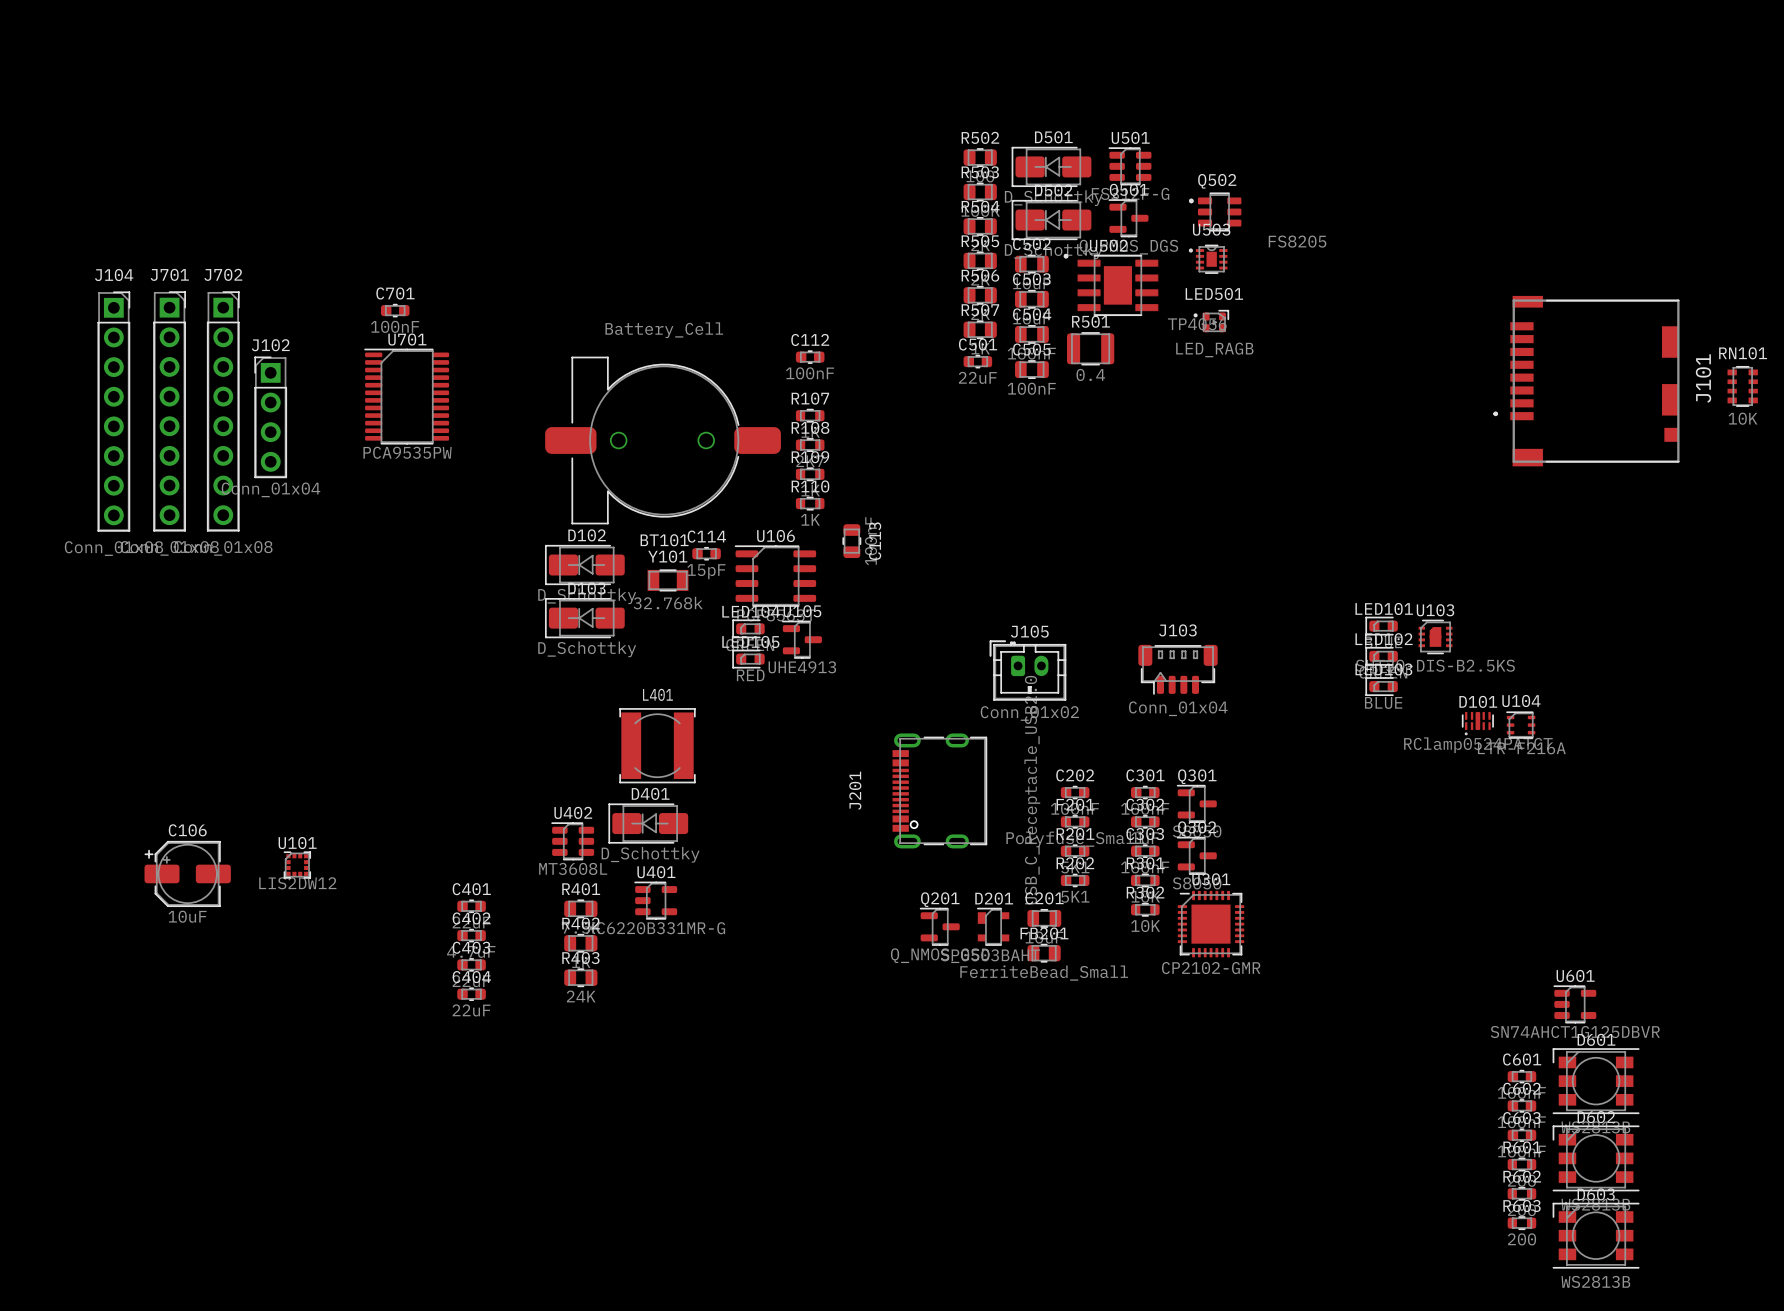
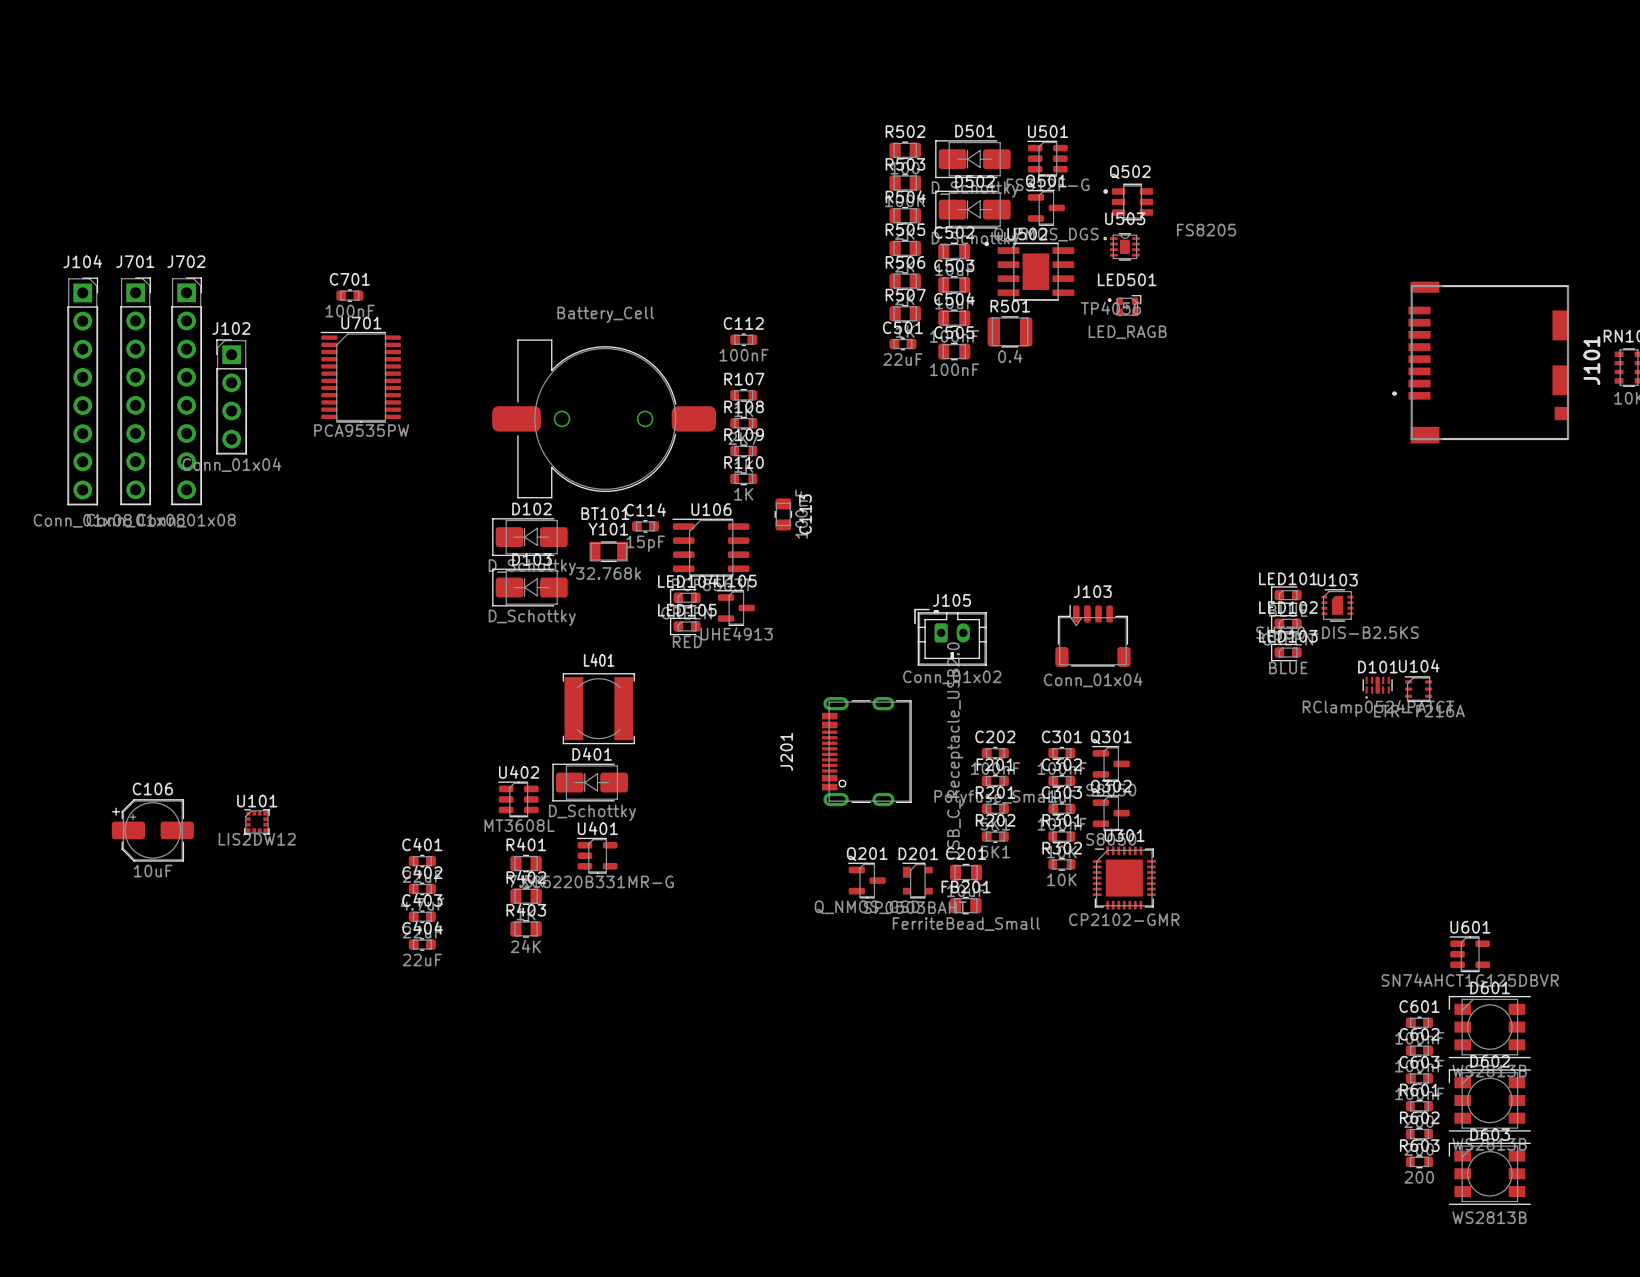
J103 footprint: [1138, 644, 1218, 695] -> [1055, 604, 1131, 667]

